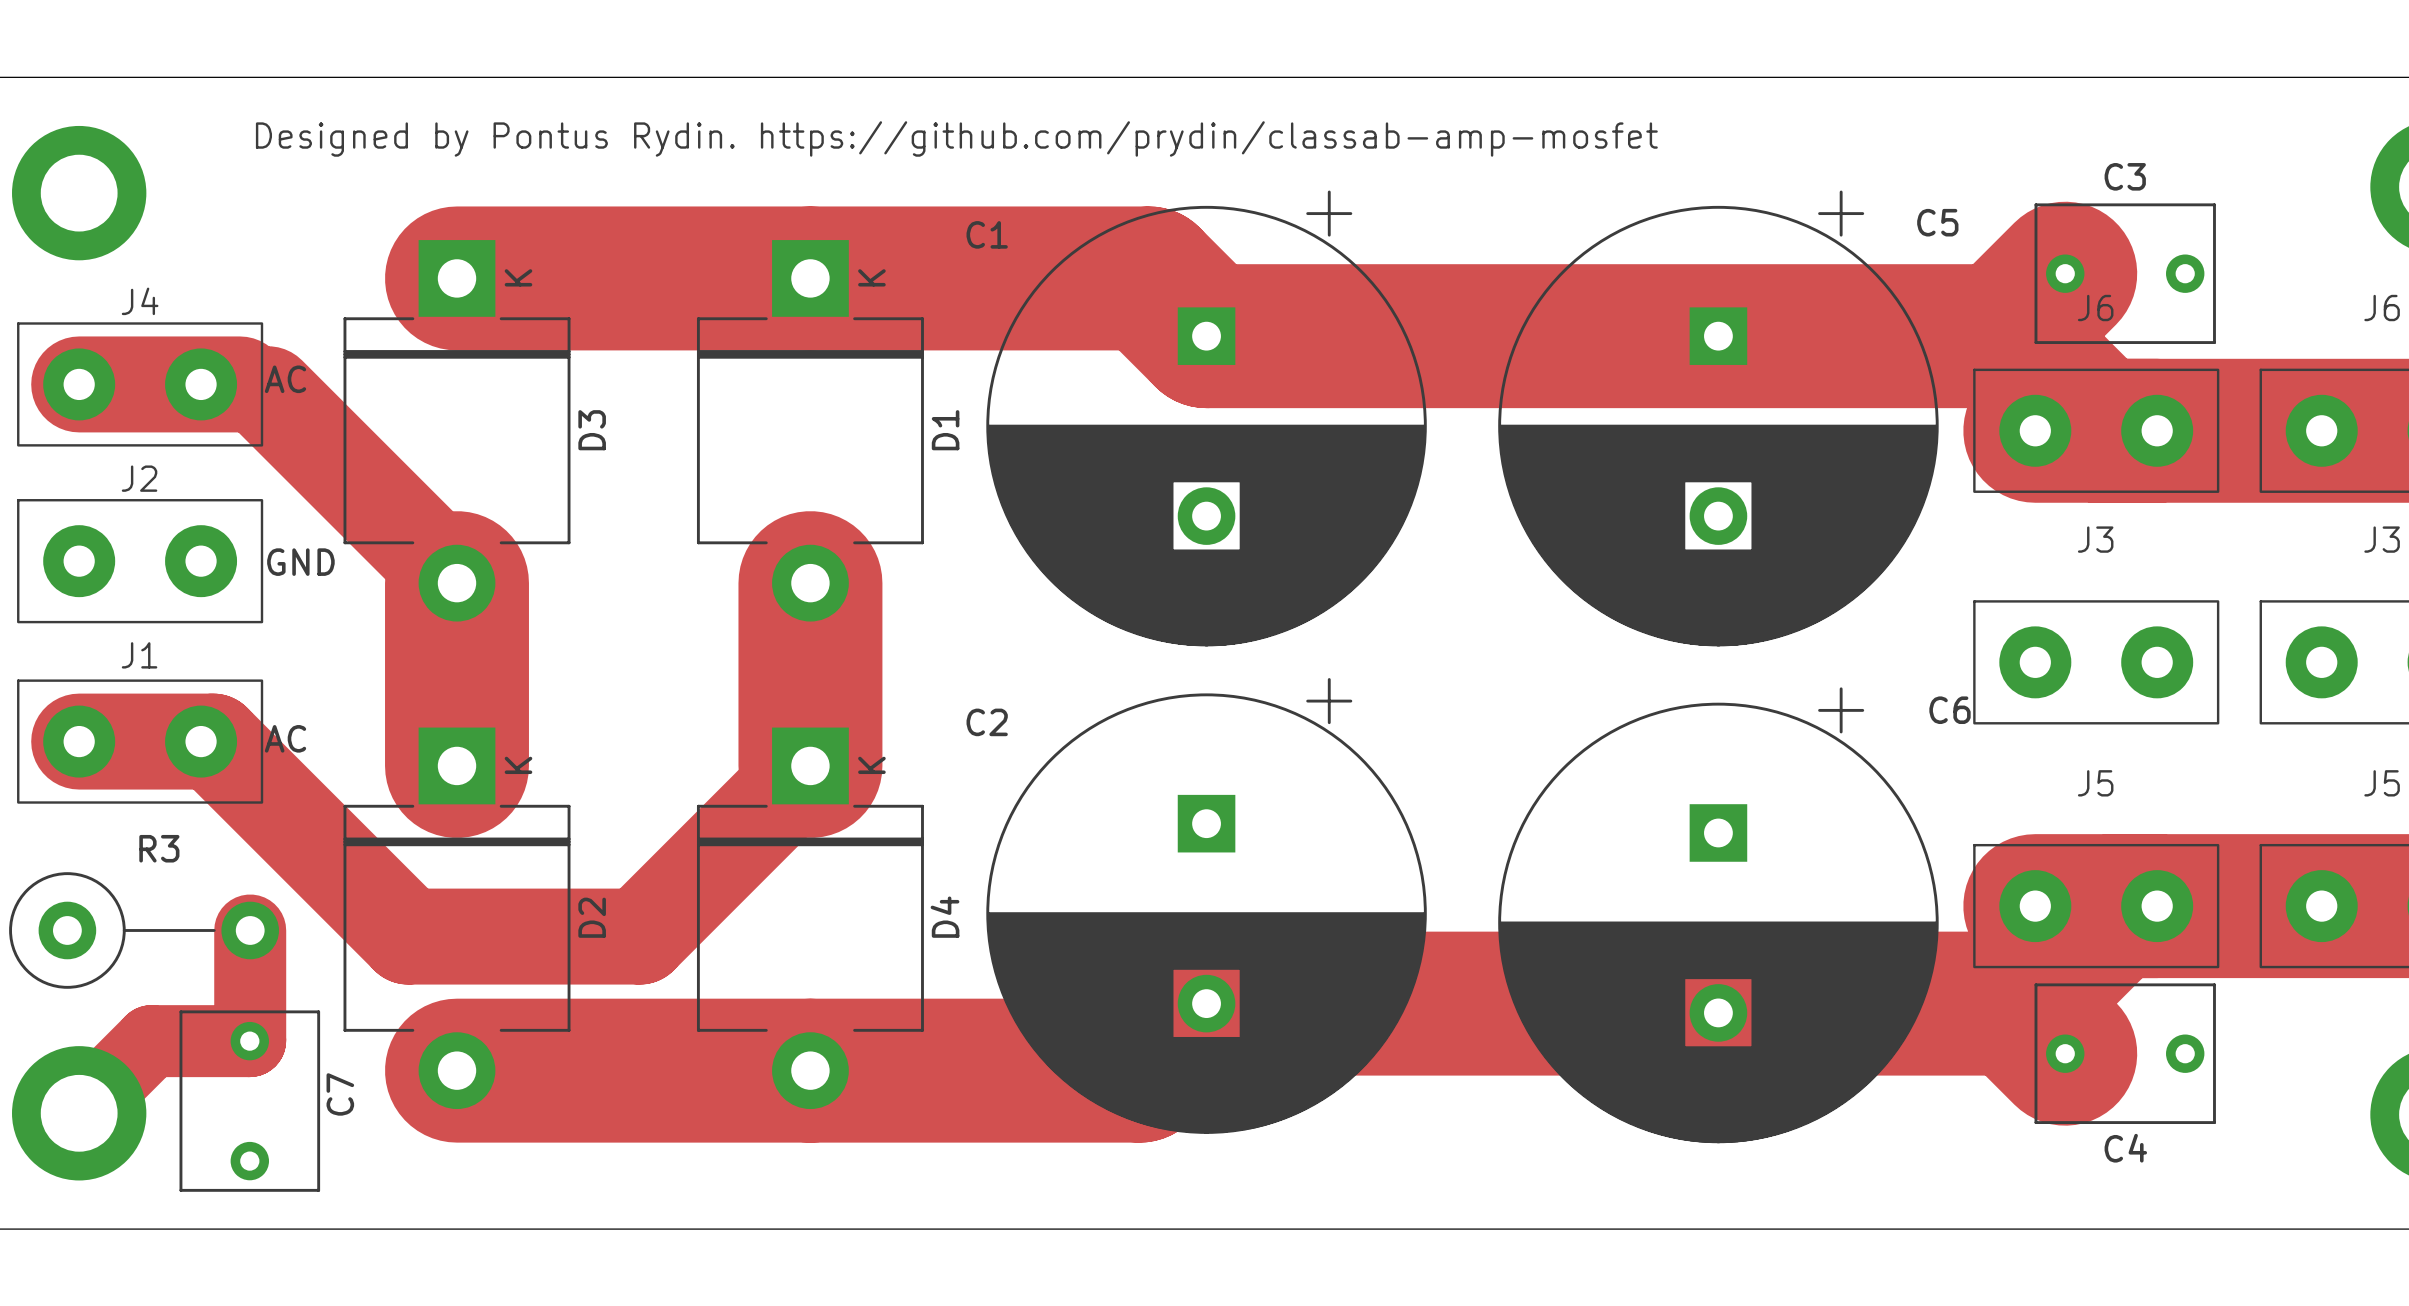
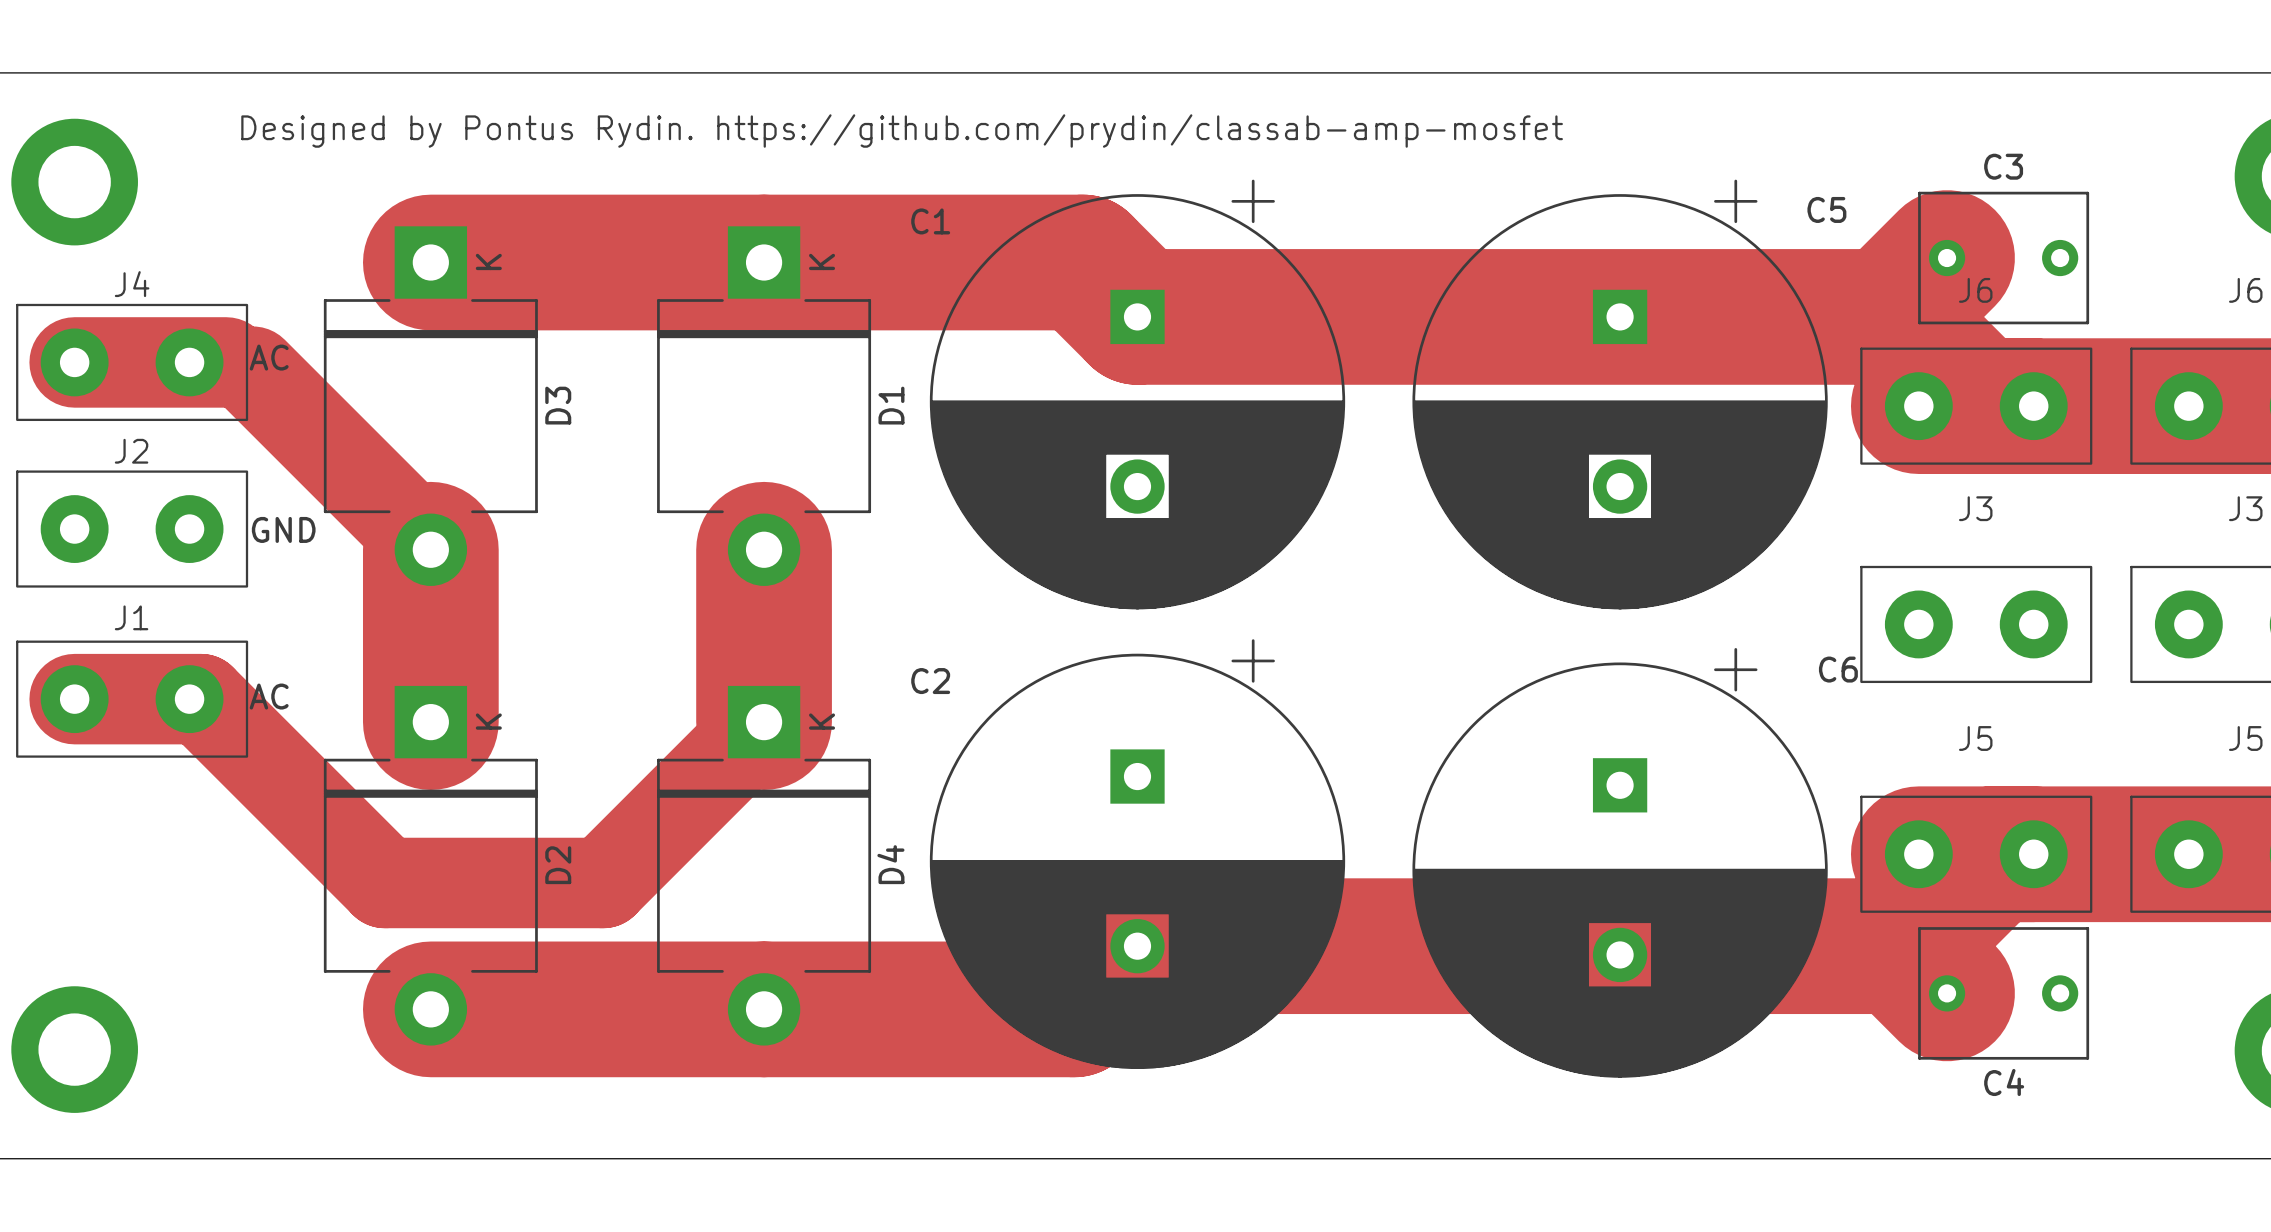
R3: (144, 930) -> none
track: (250, 930) (250, 1040) (151, 1041) (79, 1113) -> none
C7: (249, 1101) -> none

